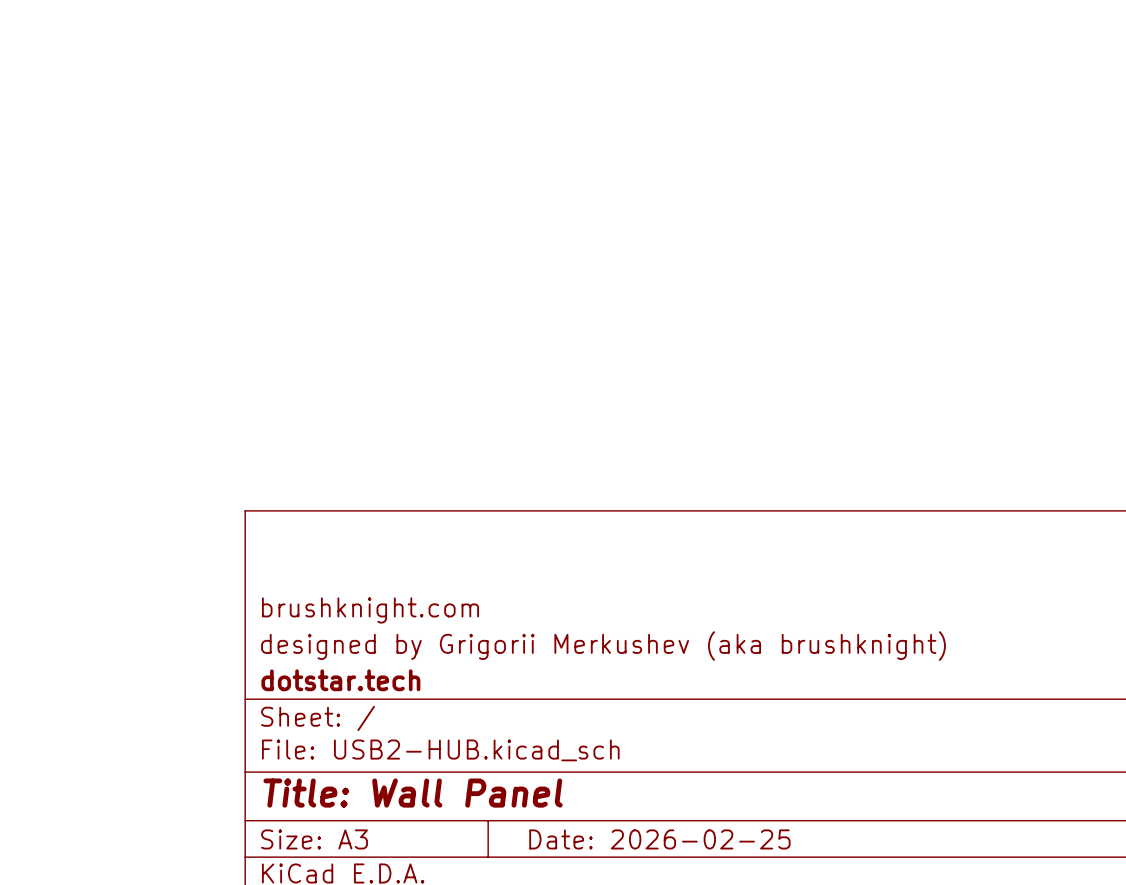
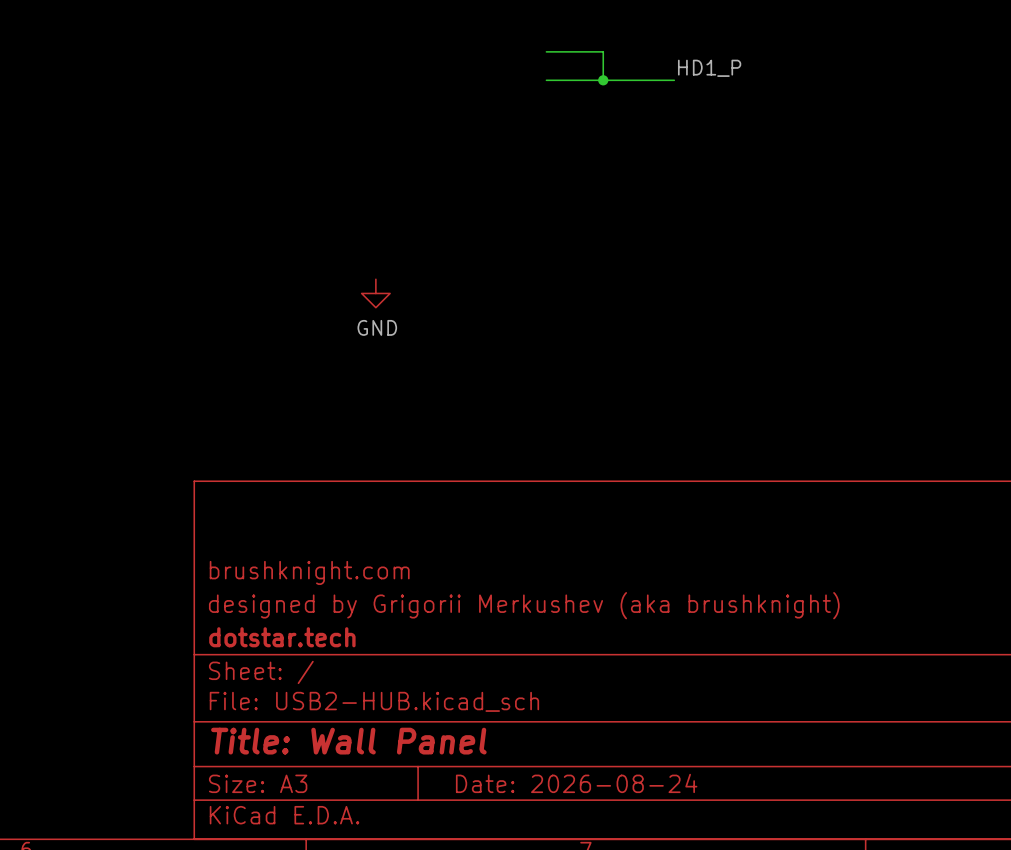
wire: none -> (546, 51) (603, 51) (603, 80)
label: none -> HD1_P (709, 68)
wire: none -> (546, 80) (674, 80)
junction: none -> (603, 80)
power symbol: none -> GND (375, 293)
title block: Date: 2026-02-25 (659, 839) -> Date: 2026-08-24 (576, 783)

